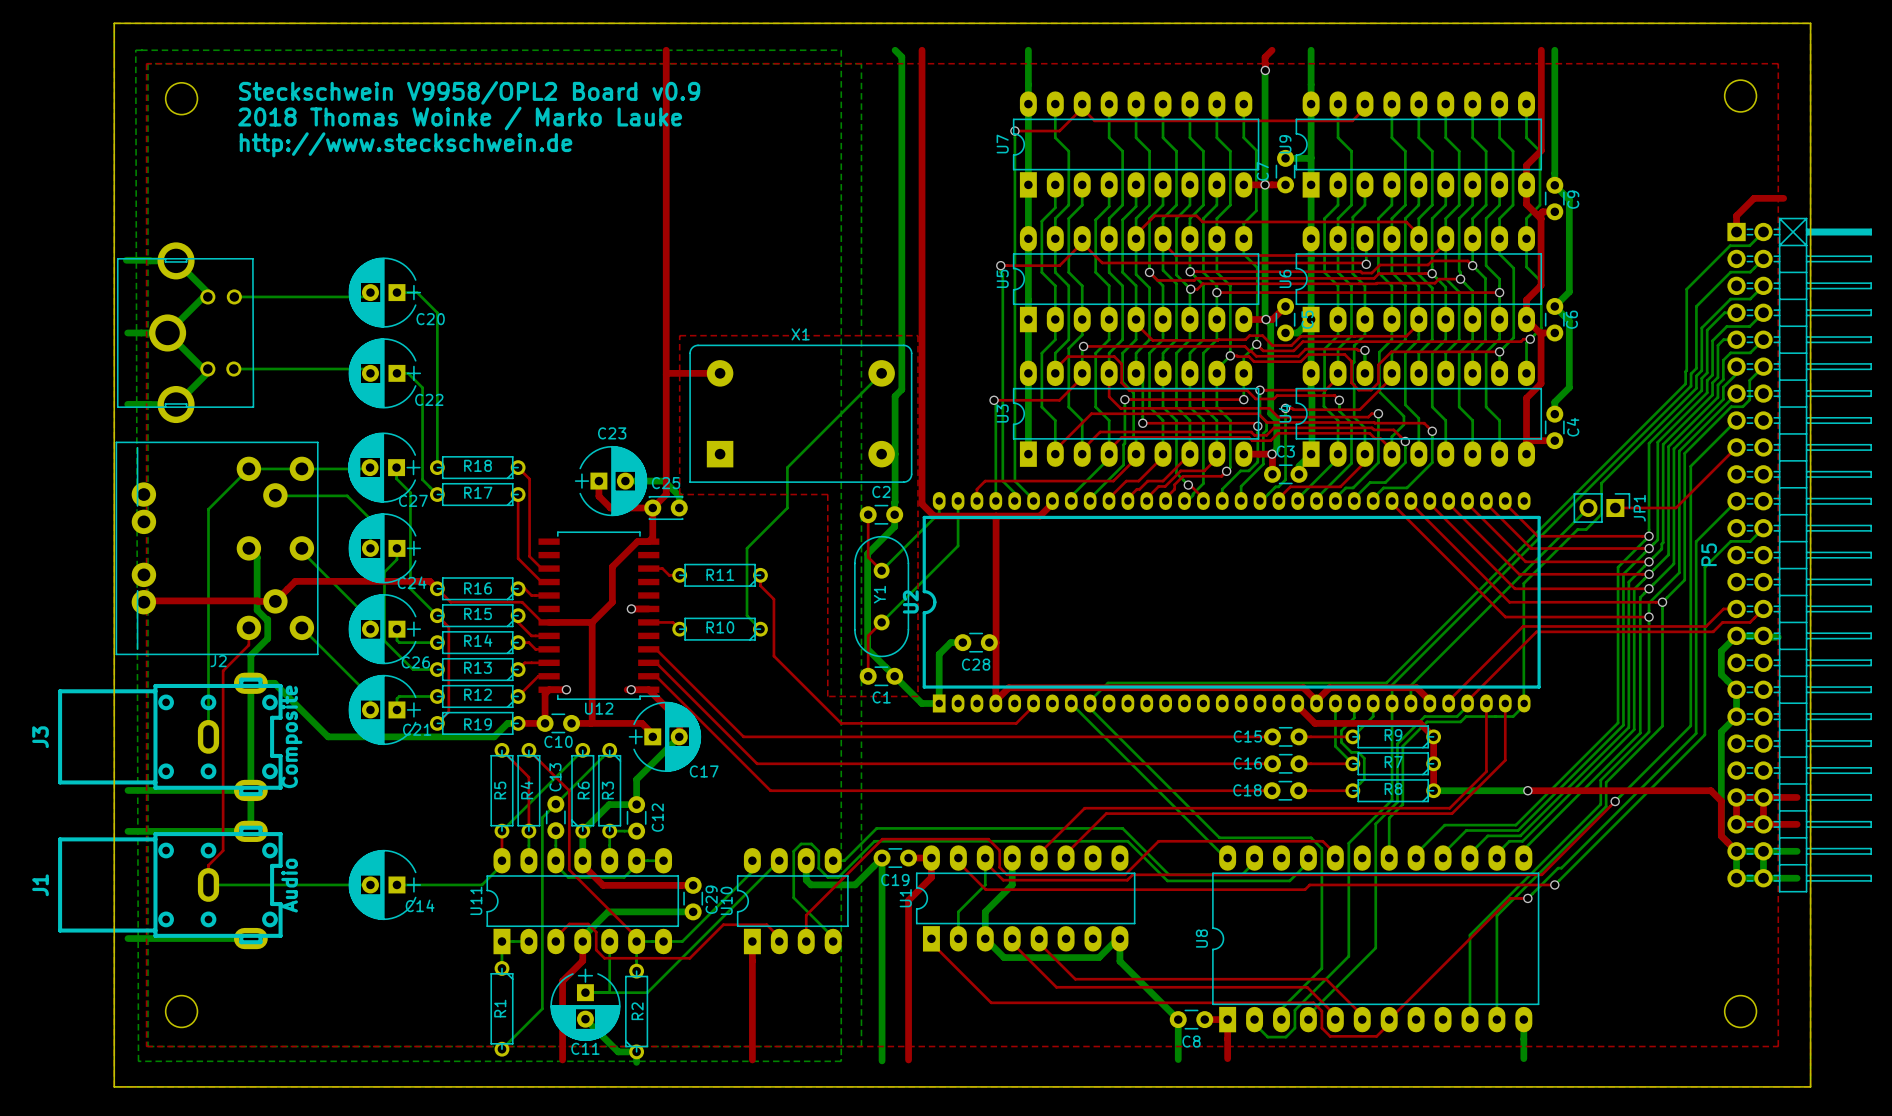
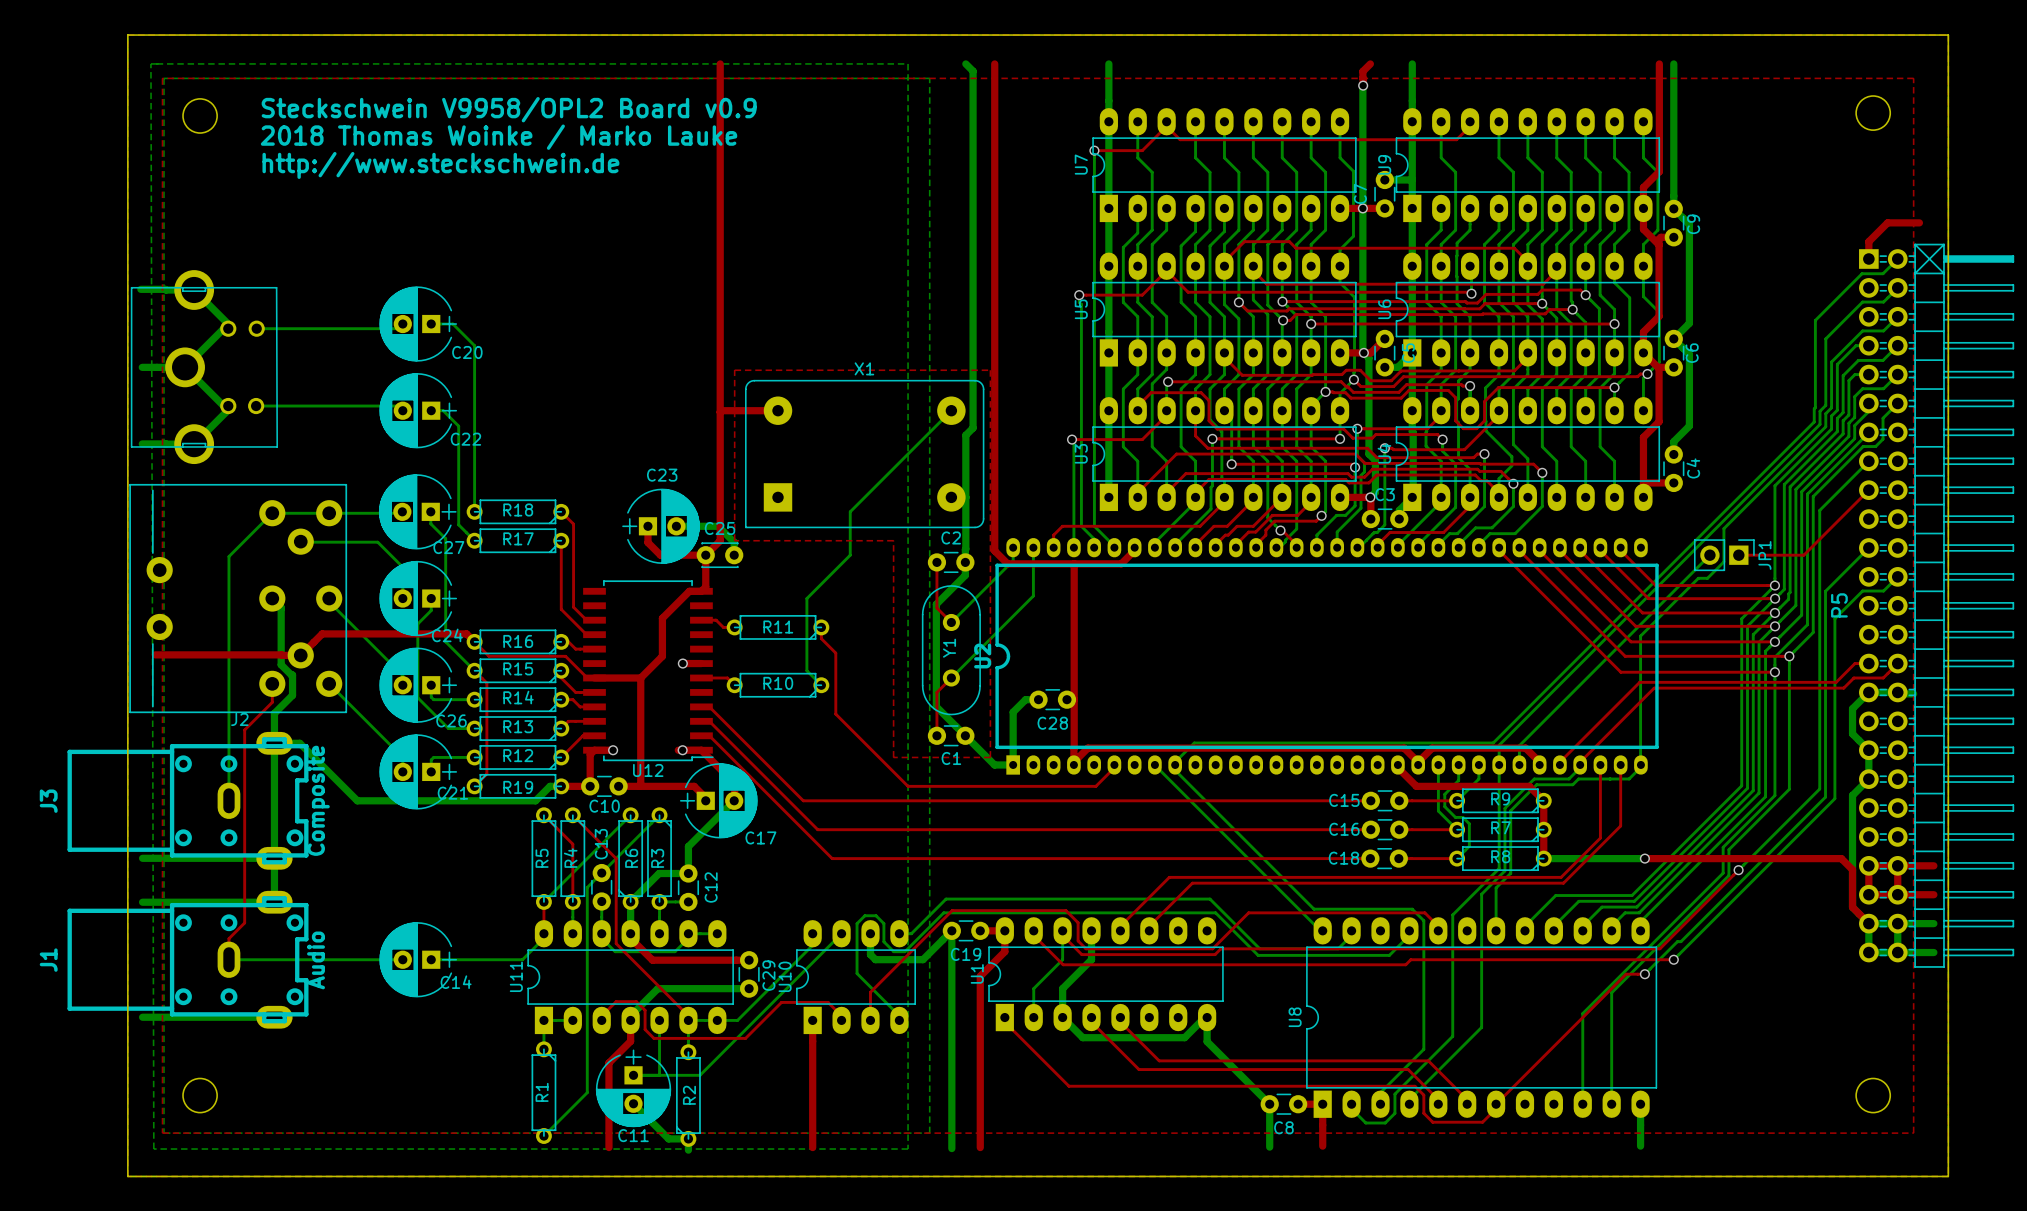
J2 footprint: [115, 441, 319, 656] -> [129, 483, 348, 714]

